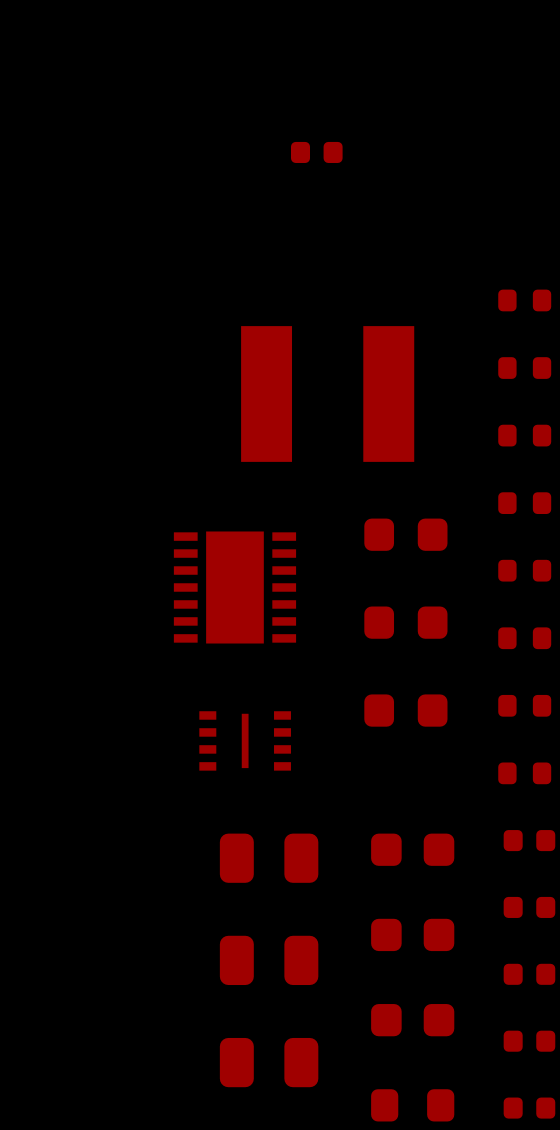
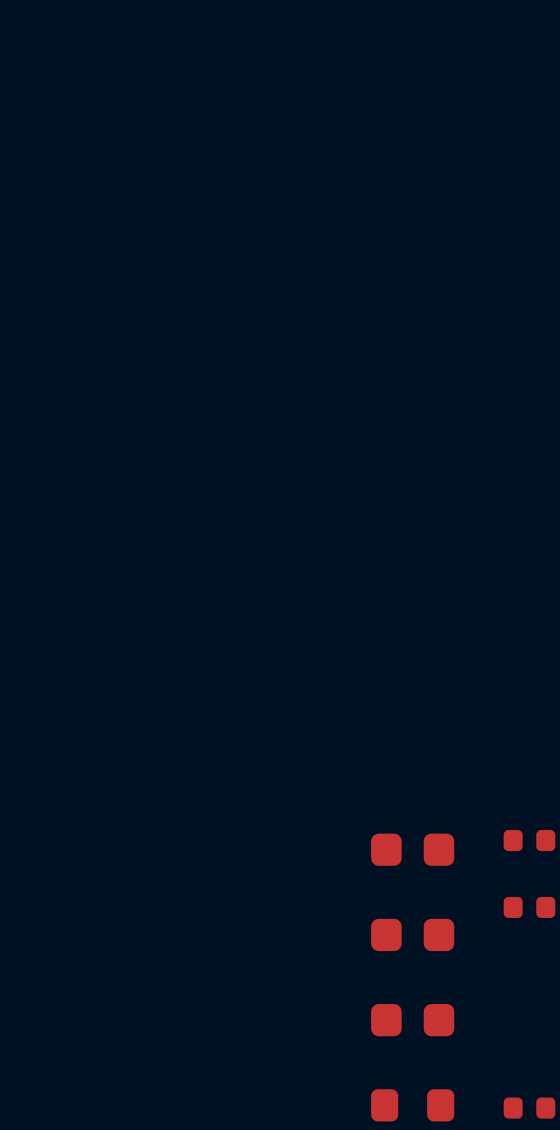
part: (316, 152) -> none
part: (524, 300) -> none
part: (524, 368) -> none
part: (327, 394) -> none
part: (524, 435) -> none
part: (524, 503) -> none
part: (405, 534) -> none
part: (524, 570) -> none
part: (234, 587) -> none
part: (405, 622) -> none
part: (524, 638) -> none
part: (524, 705) -> none
part: (405, 710) -> none
part: (245, 740) -> none
part: (524, 773) -> none
part: (269, 858) -> none
part: (269, 960) -> none
part: (529, 974) -> none
part: (529, 1041) -> none
part: (269, 1062) -> none

